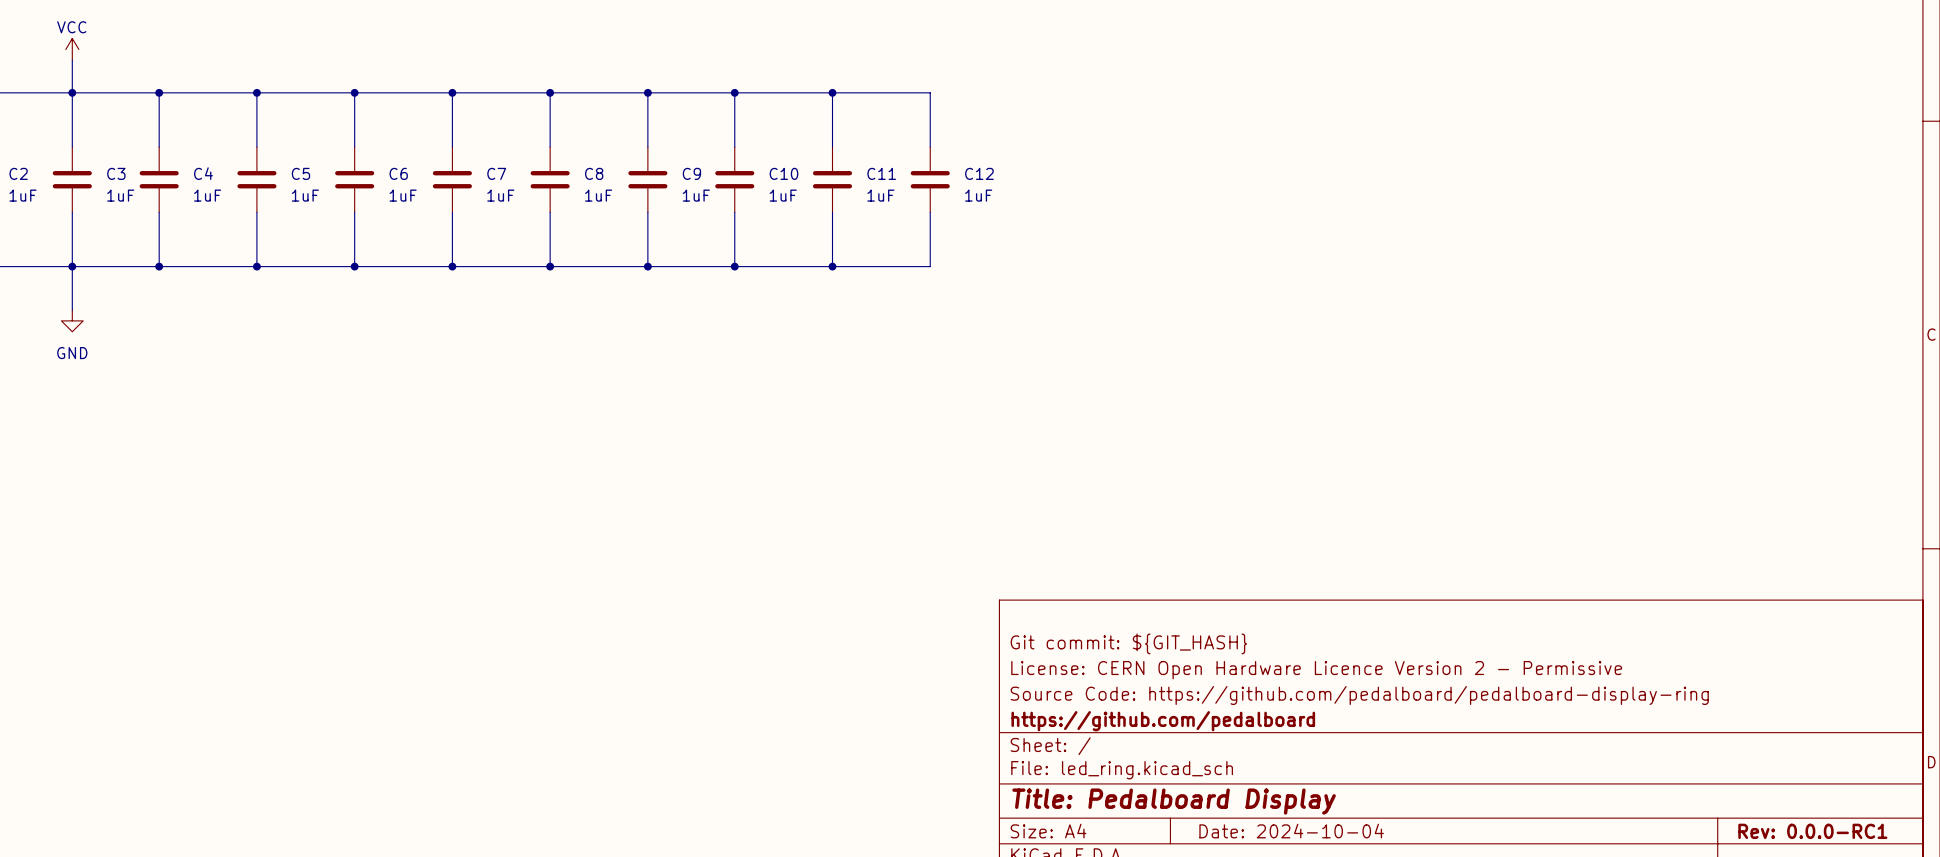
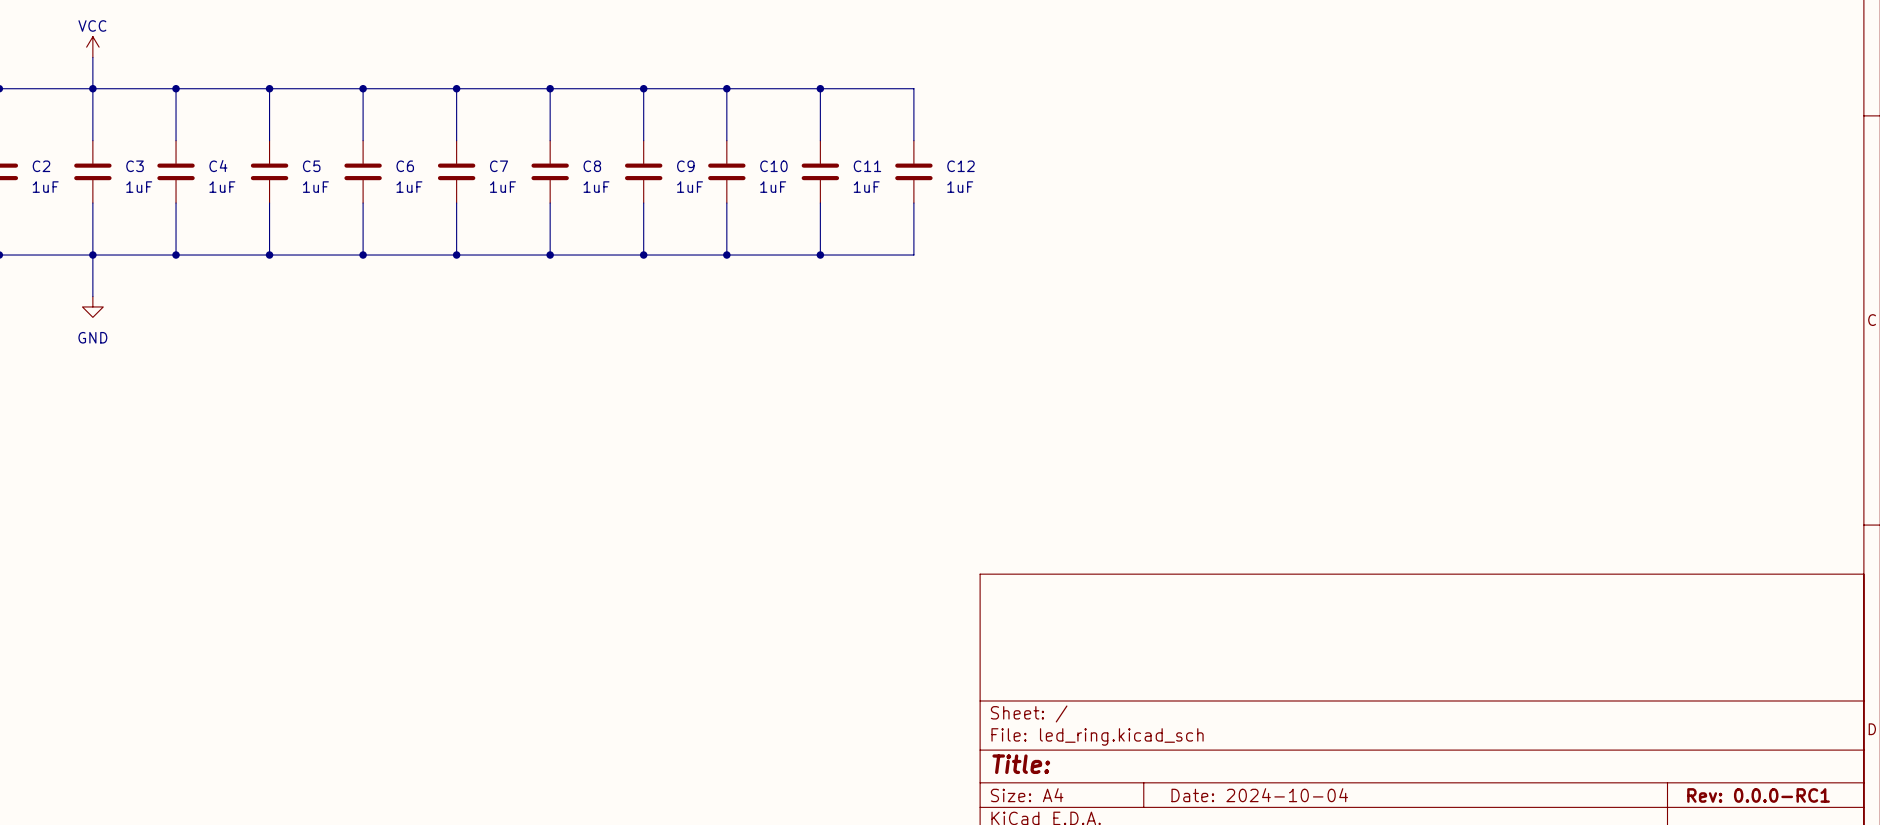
title block: Git commit: ${GIT_HASH} (1128, 643) -> none
title block: License: CERN Open Hardware Licence Version 2 - Permissive (1316, 670) -> none
title block: Source Code: https://github.com/pedalboard/pedalboard-display-ring (1359, 695) -> none
title block: https://github.com/pedalboard (1163, 721) -> none
title block: Title: Pedalboard Display (1174, 801) -> Title: (1021, 764)

